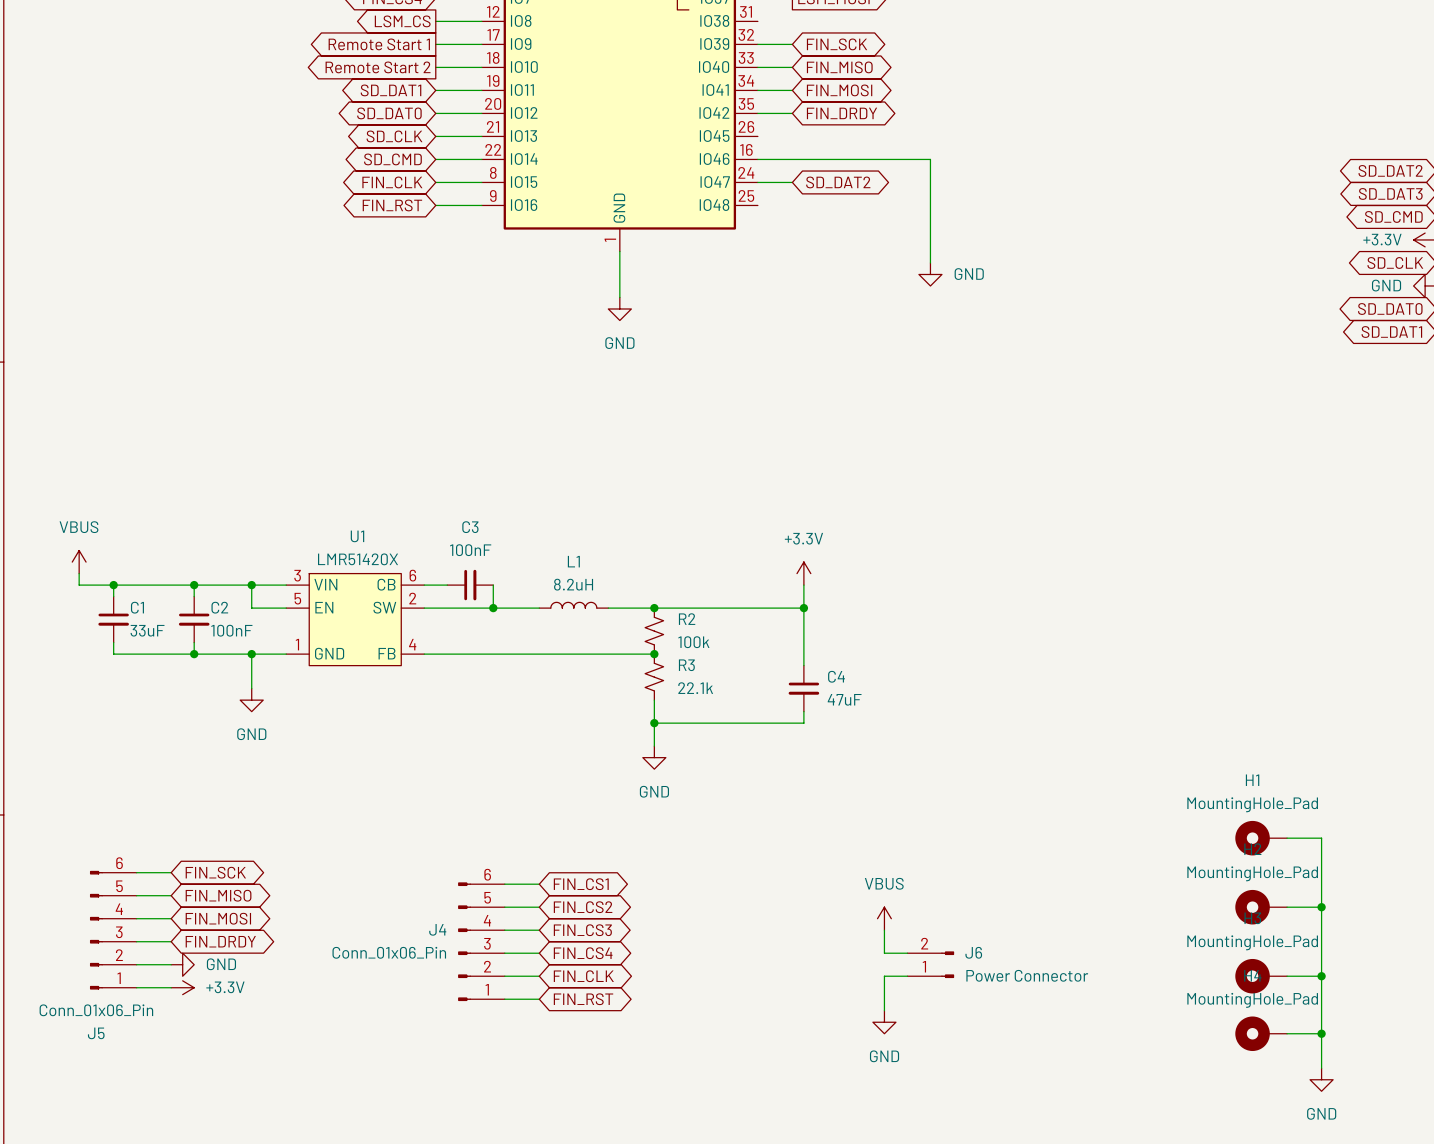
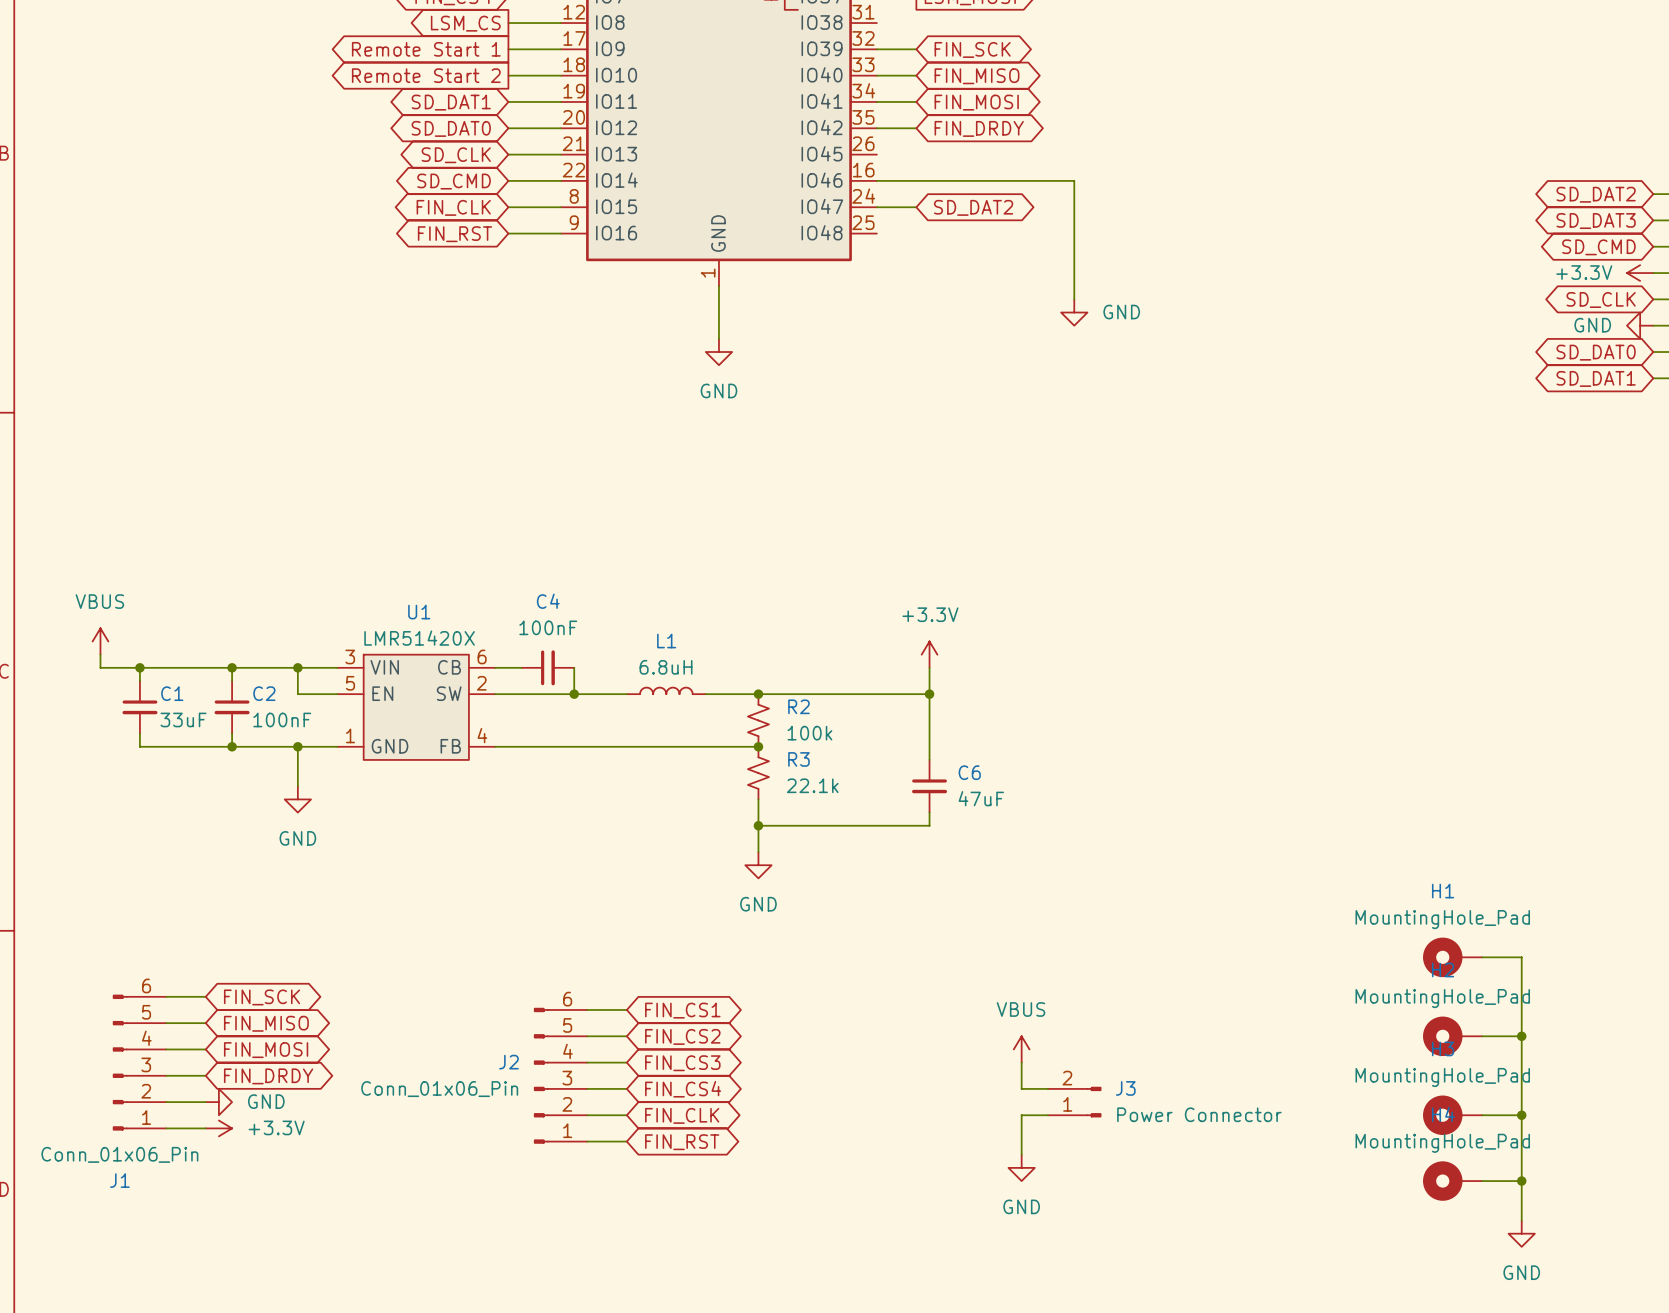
C3 name: C3 (470, 527) -> C4 (548, 601)
L1 value: 8.2uH (573, 584) -> 6.8uH (666, 667)
C4 name: C4 (836, 676) -> C6 (969, 772)
J4 name: J4 (437, 929) -> J2 (508, 1062)
J6 name: J6 (973, 952) -> J3 (1125, 1088)
J5 name: J5 (96, 1033) -> J1 (119, 1180)

